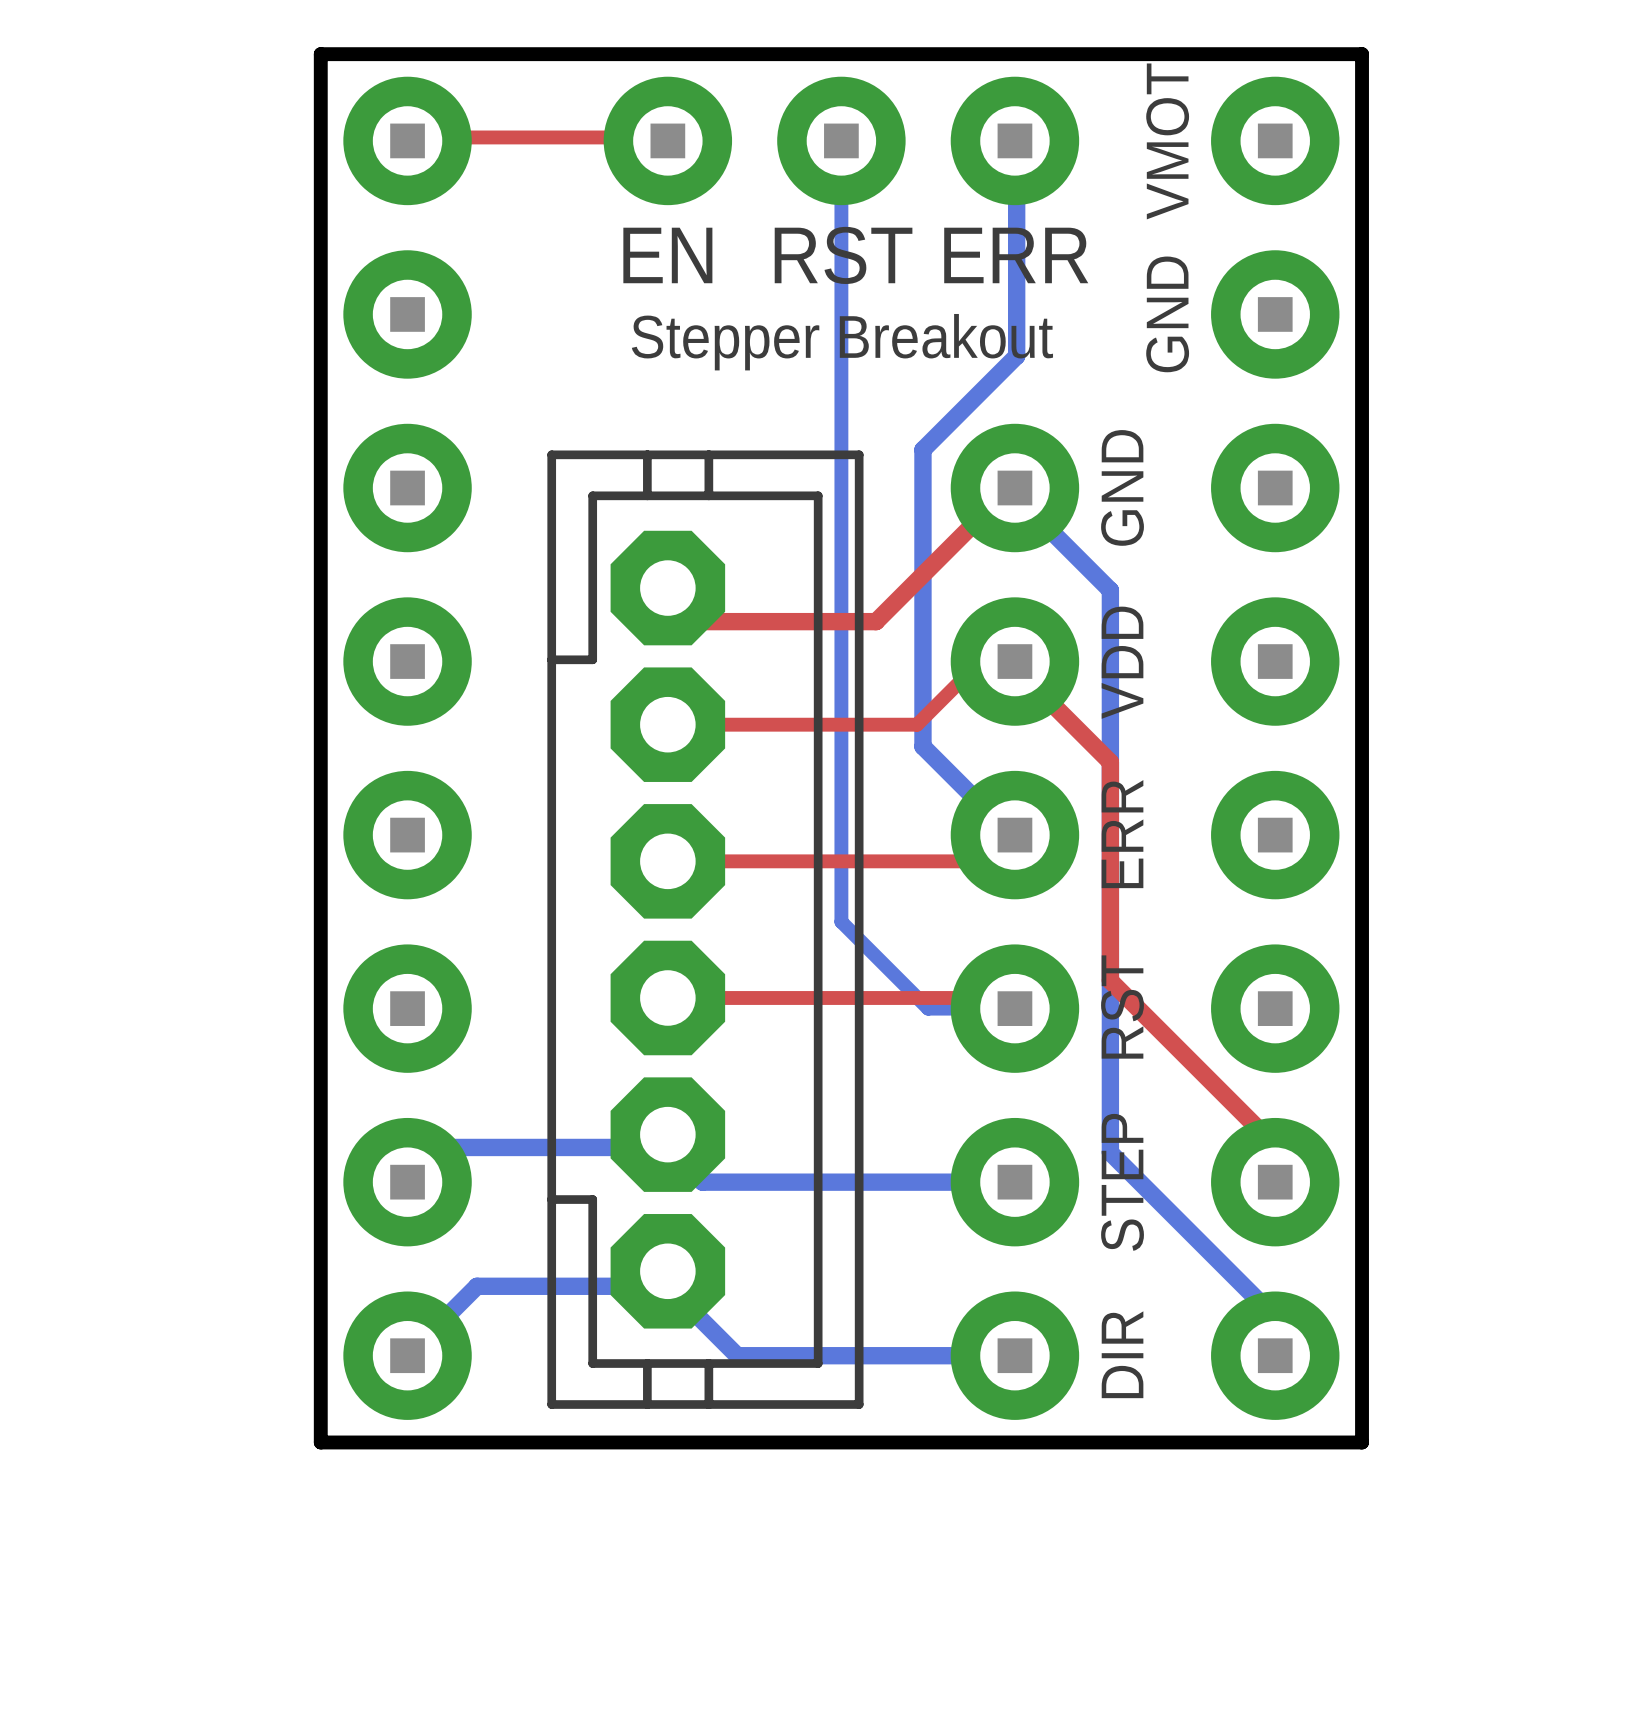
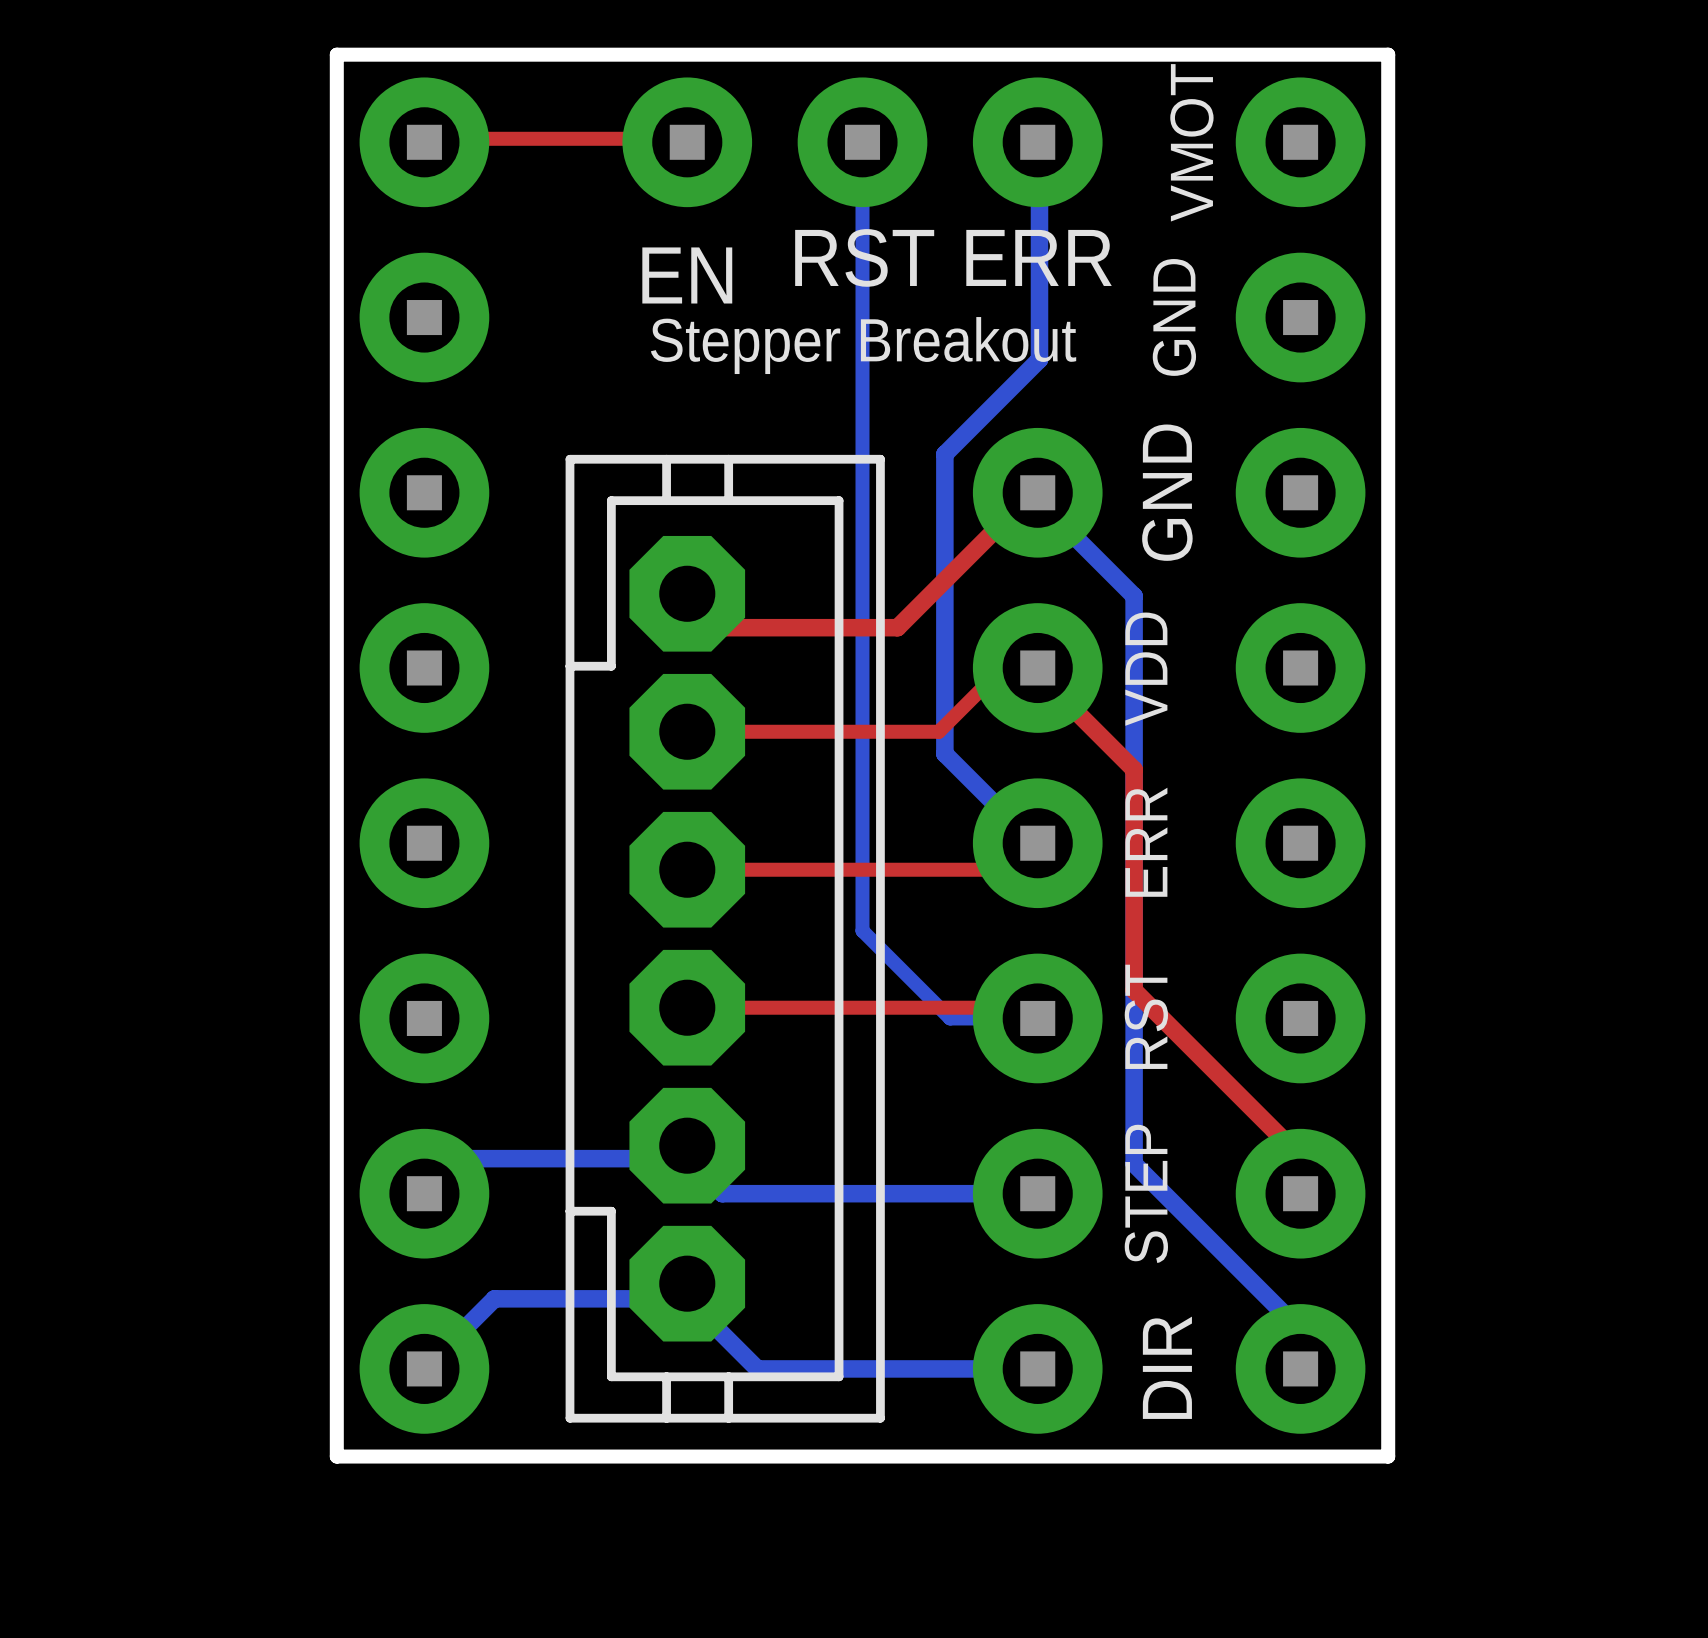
text position: EN (667, 255) -> EN (687, 275)
text position: GND (1167, 314) -> GND (1174, 317)
text position: GND (1122, 487) -> GND (1167, 492)
text position: DIR (1122, 1354) -> DIR (1167, 1367)

